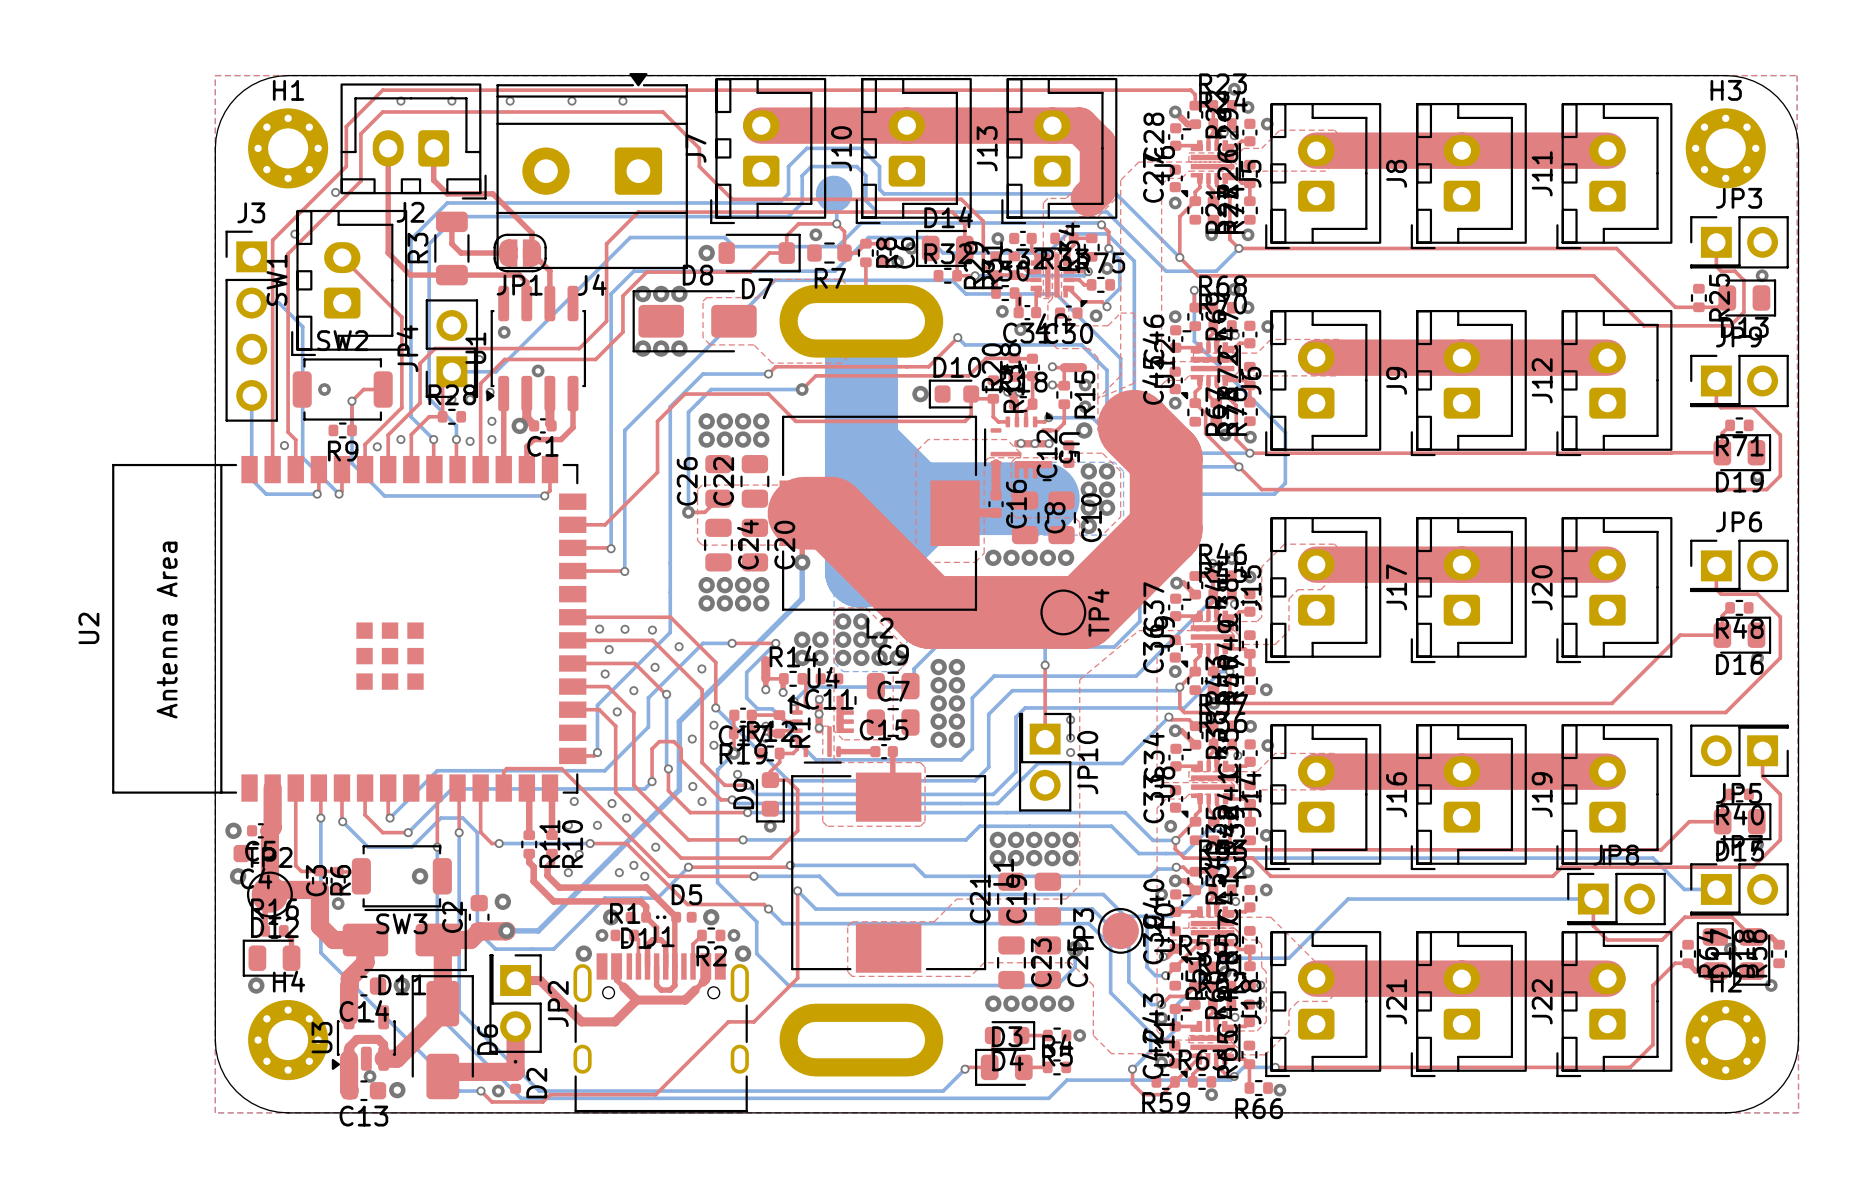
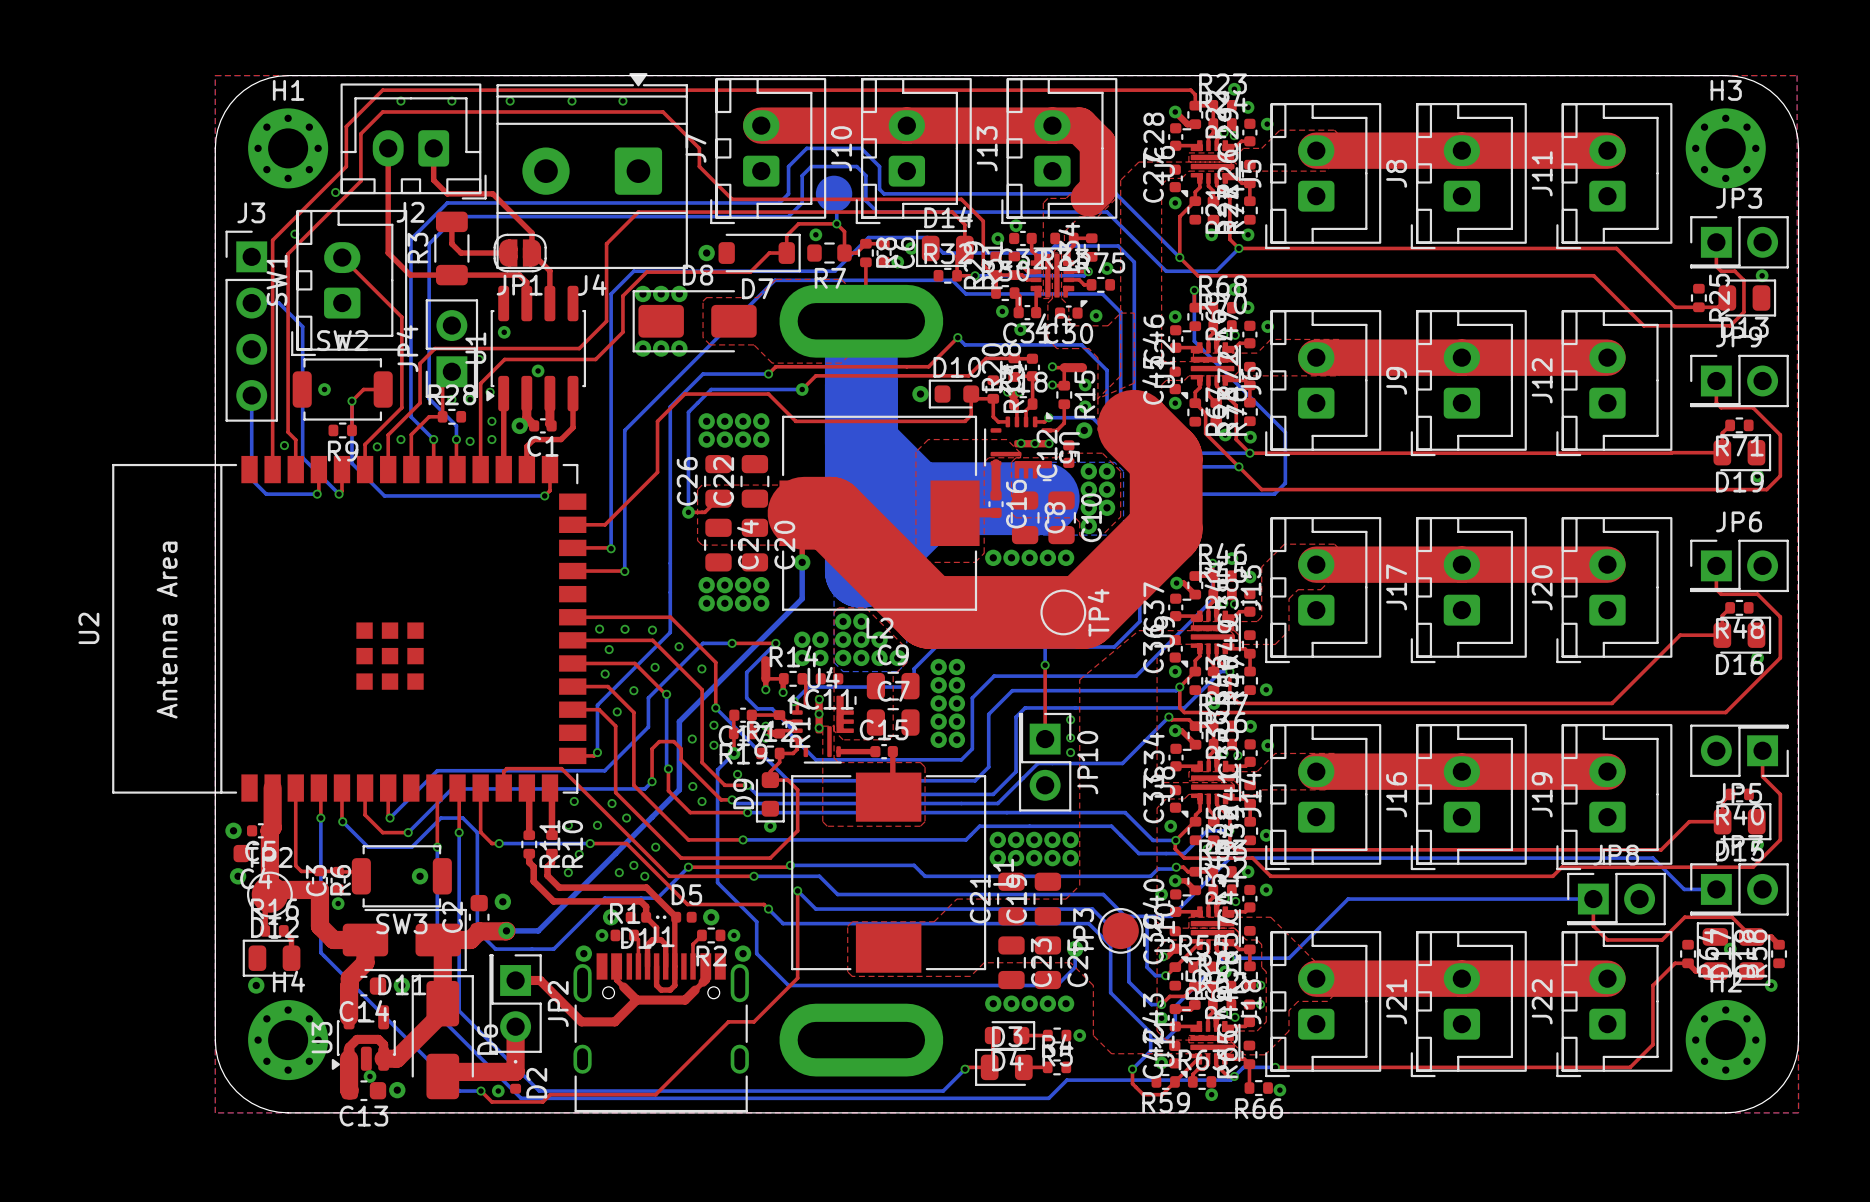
top track: (1101, 224) (1108, 232) (1108, 248) -> none
bottom track: (1101, 224) (1099, 222) (861, 222) (837, 246) (733, 246) (724, 237) (630, 237) (496, 371) (451, 371) -> none
via: (1101, 224) -> none
via: none -> (1016, 225)
bottom track: (1054, 246) (1066, 233) (1107, 233) (1134, 262) -> (1054, 246) (1118, 246) (1134, 262)
bottom track: (1108, 248) (1119, 259) (1119, 288) (1107, 301) (1107, 306) -> none
via: (1108, 248) -> none
top track: (1068, 288) (1082, 301) (1102, 301) (1107, 306) -> none
bottom track: (1056, 293) (1120, 358) -> (1056, 293) (1102, 293) (1120, 312) (1120, 358)
via: (1107, 306) -> none

